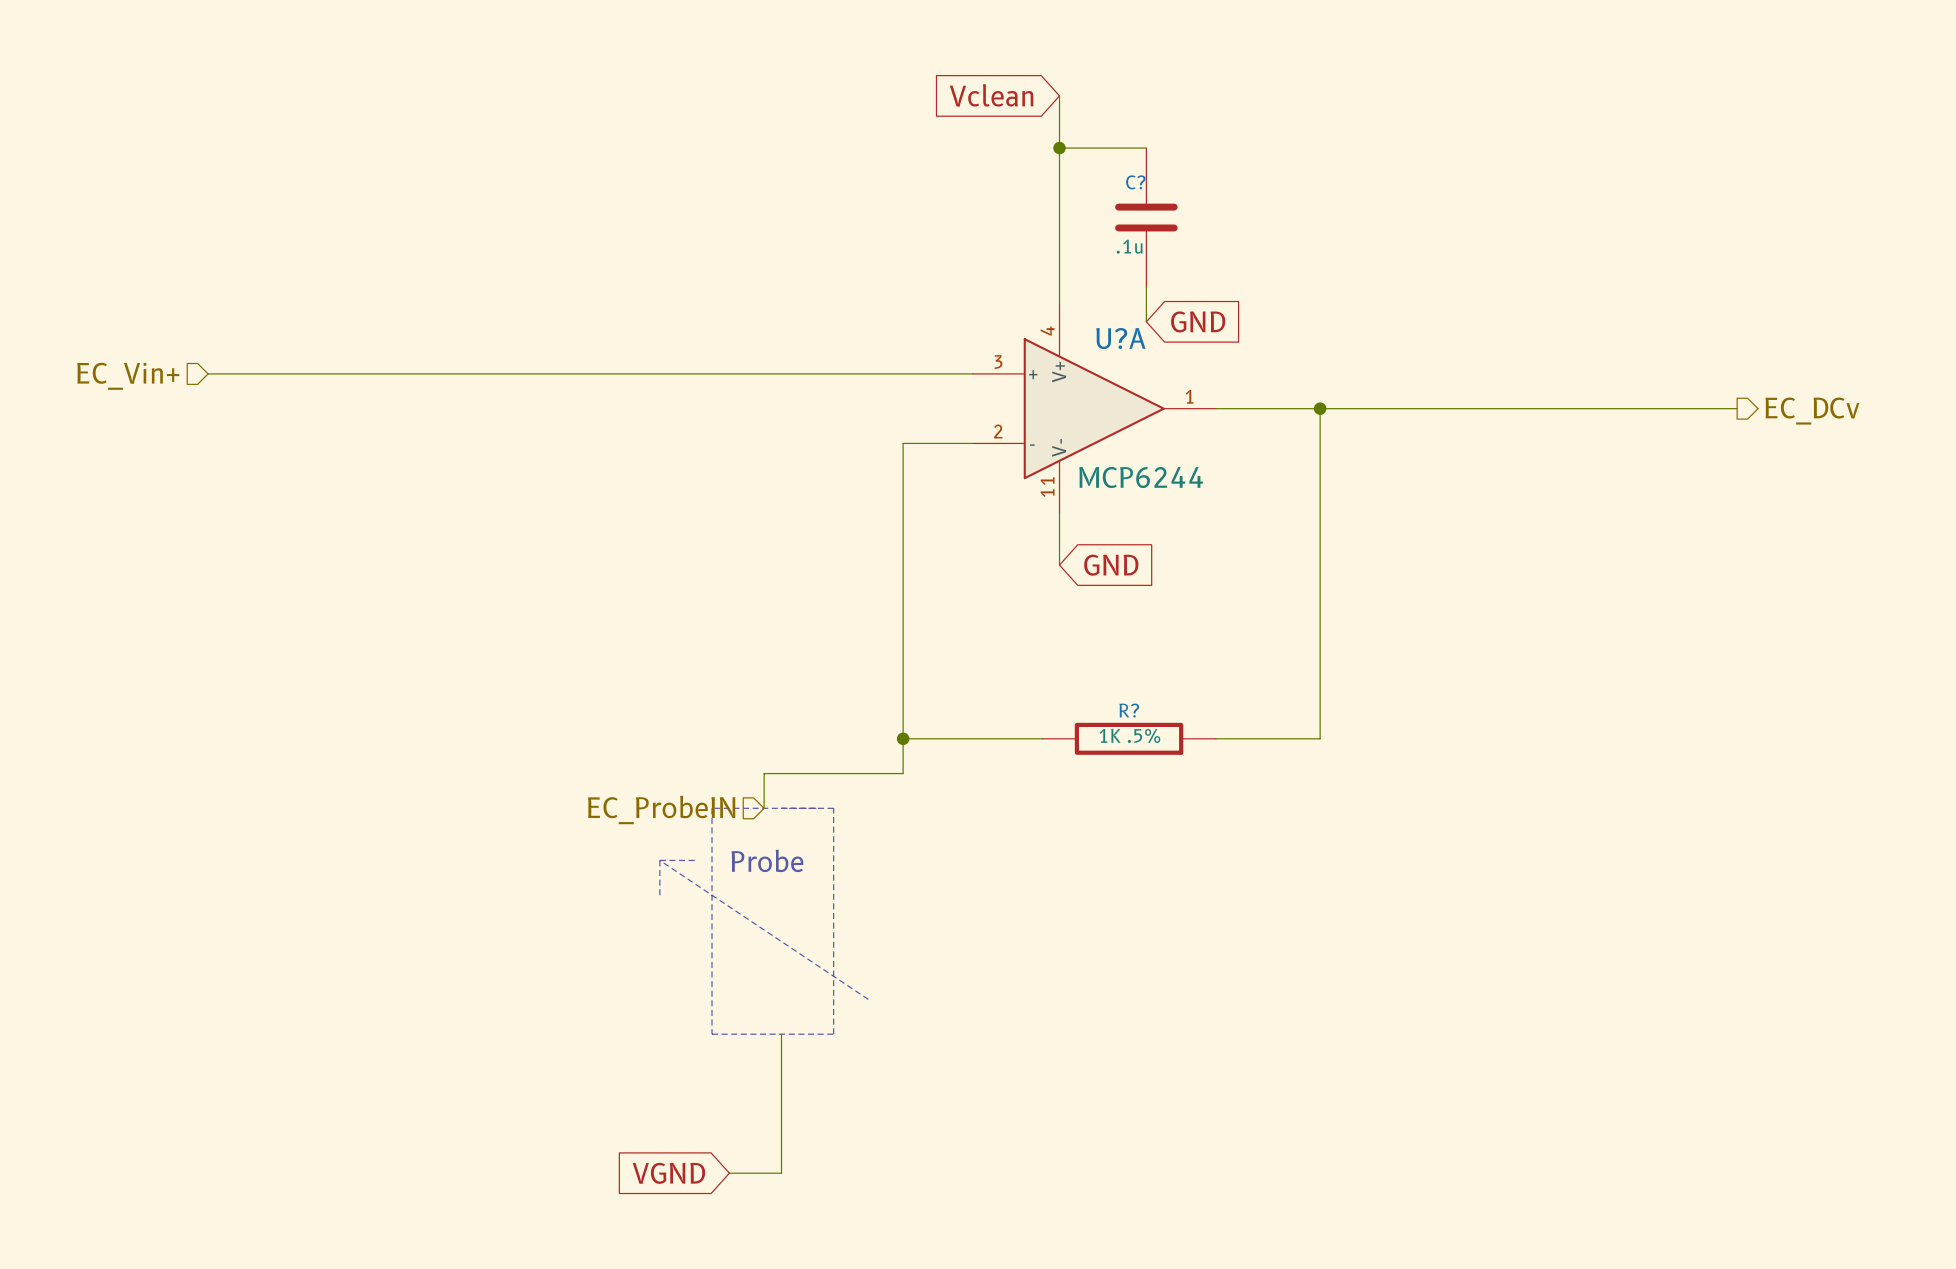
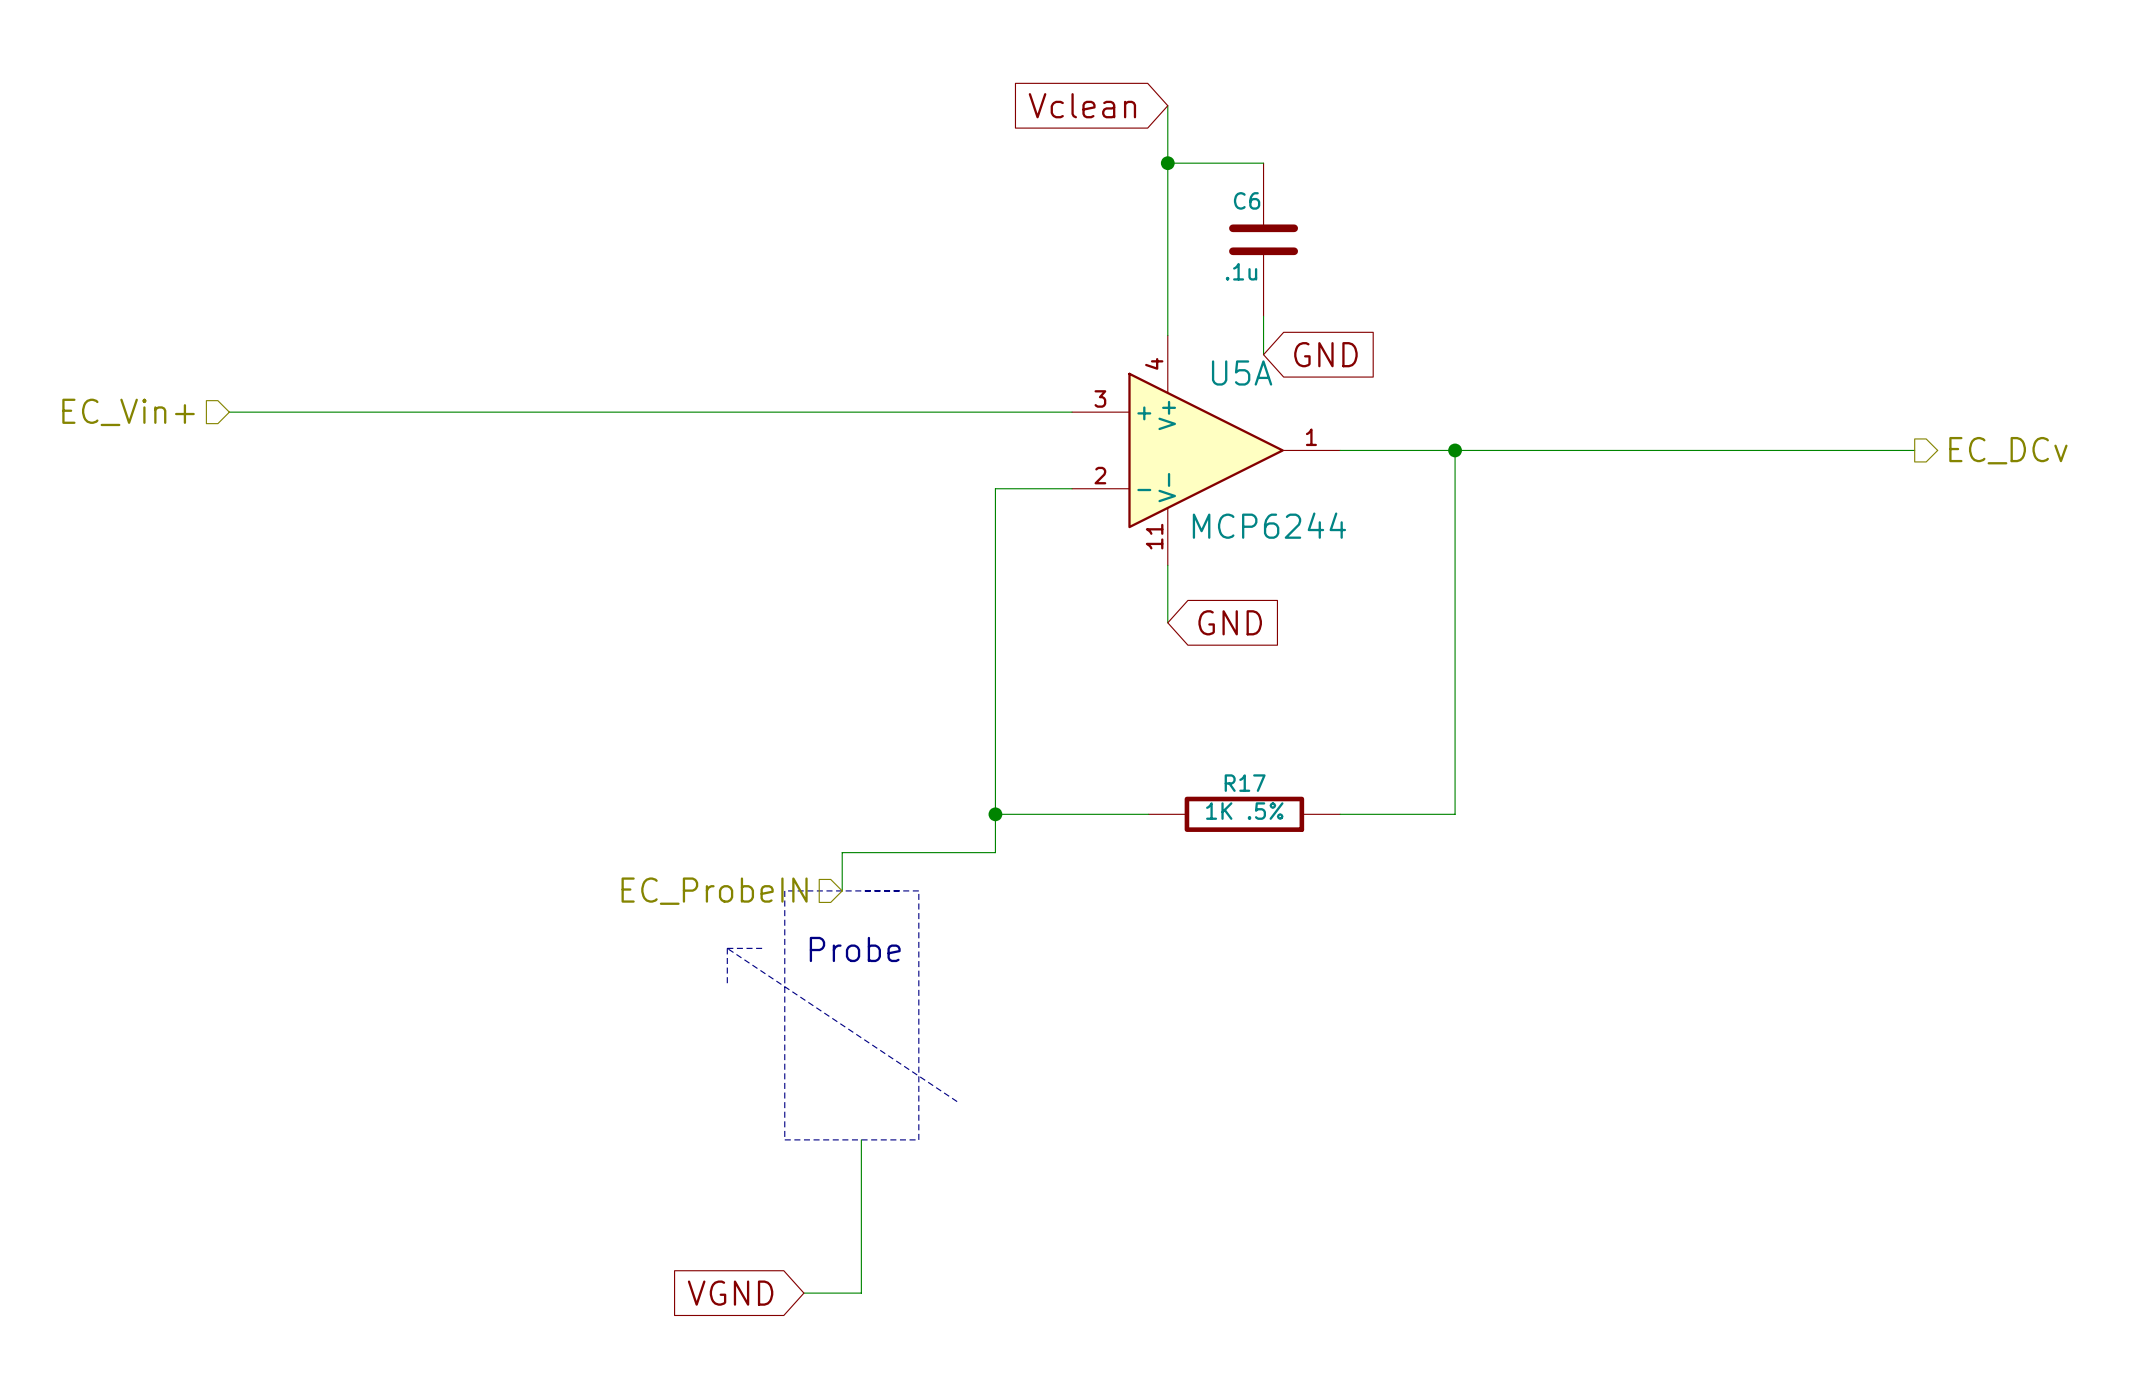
C? name: C? (1135, 182) -> C6 (1247, 200)
U?A name: U?A (1120, 338) -> U5A (1242, 372)
R? name: R? (1129, 710) -> R17 (1245, 783)

